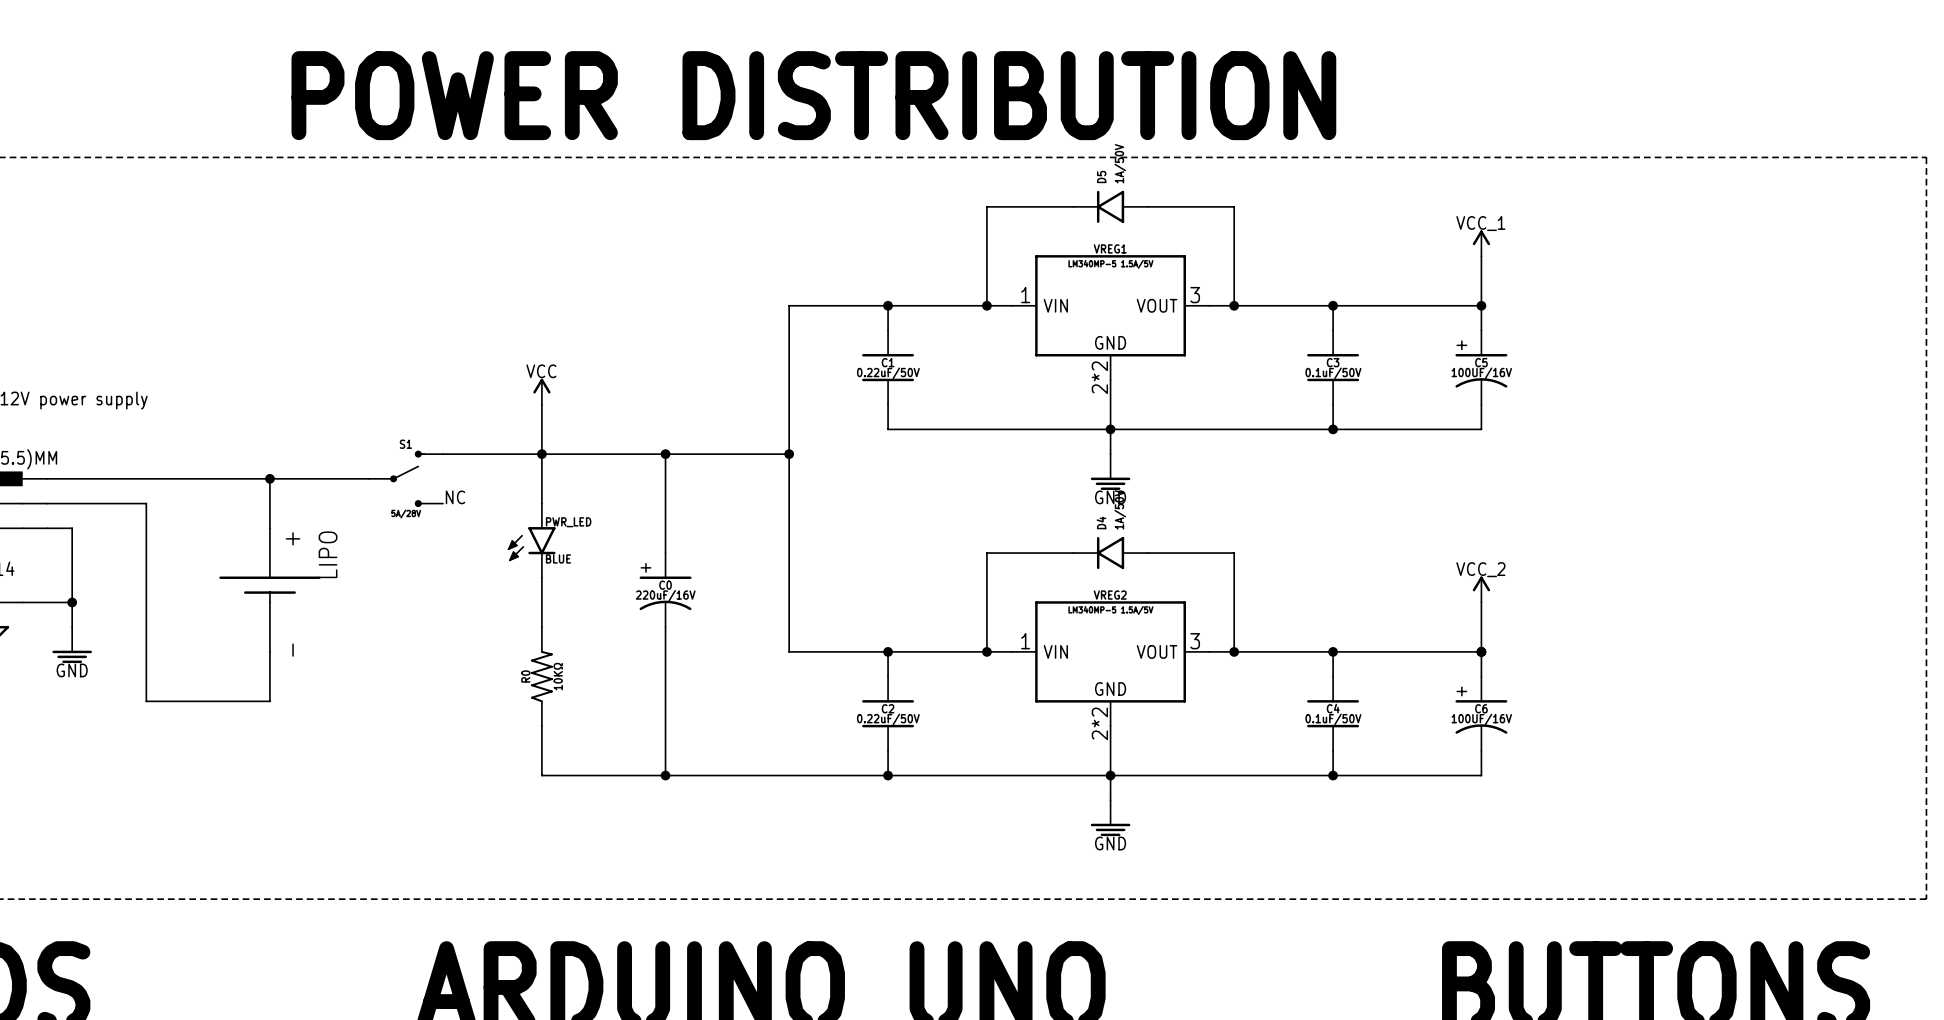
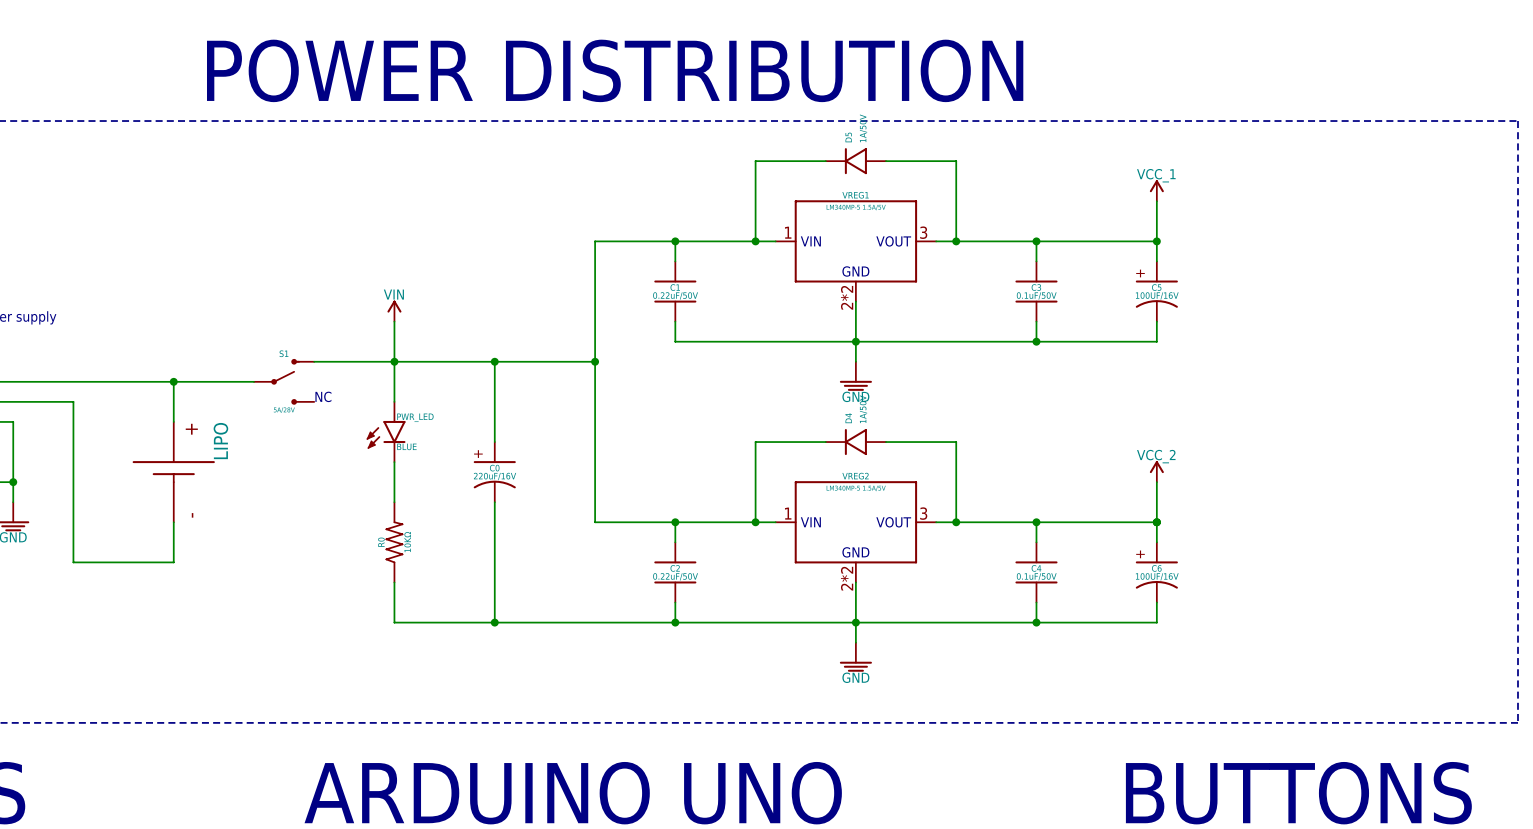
power symbol text: VCC (541, 371) -> VIN (393, 294)

